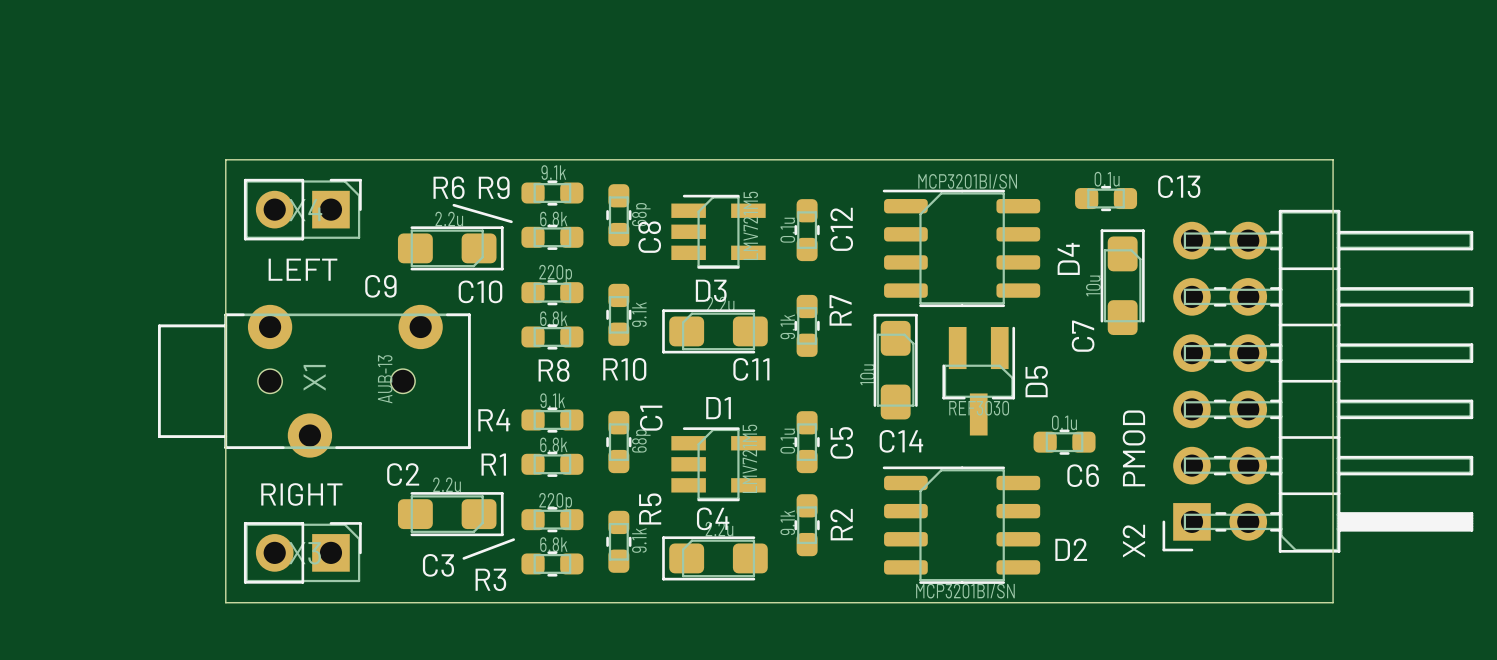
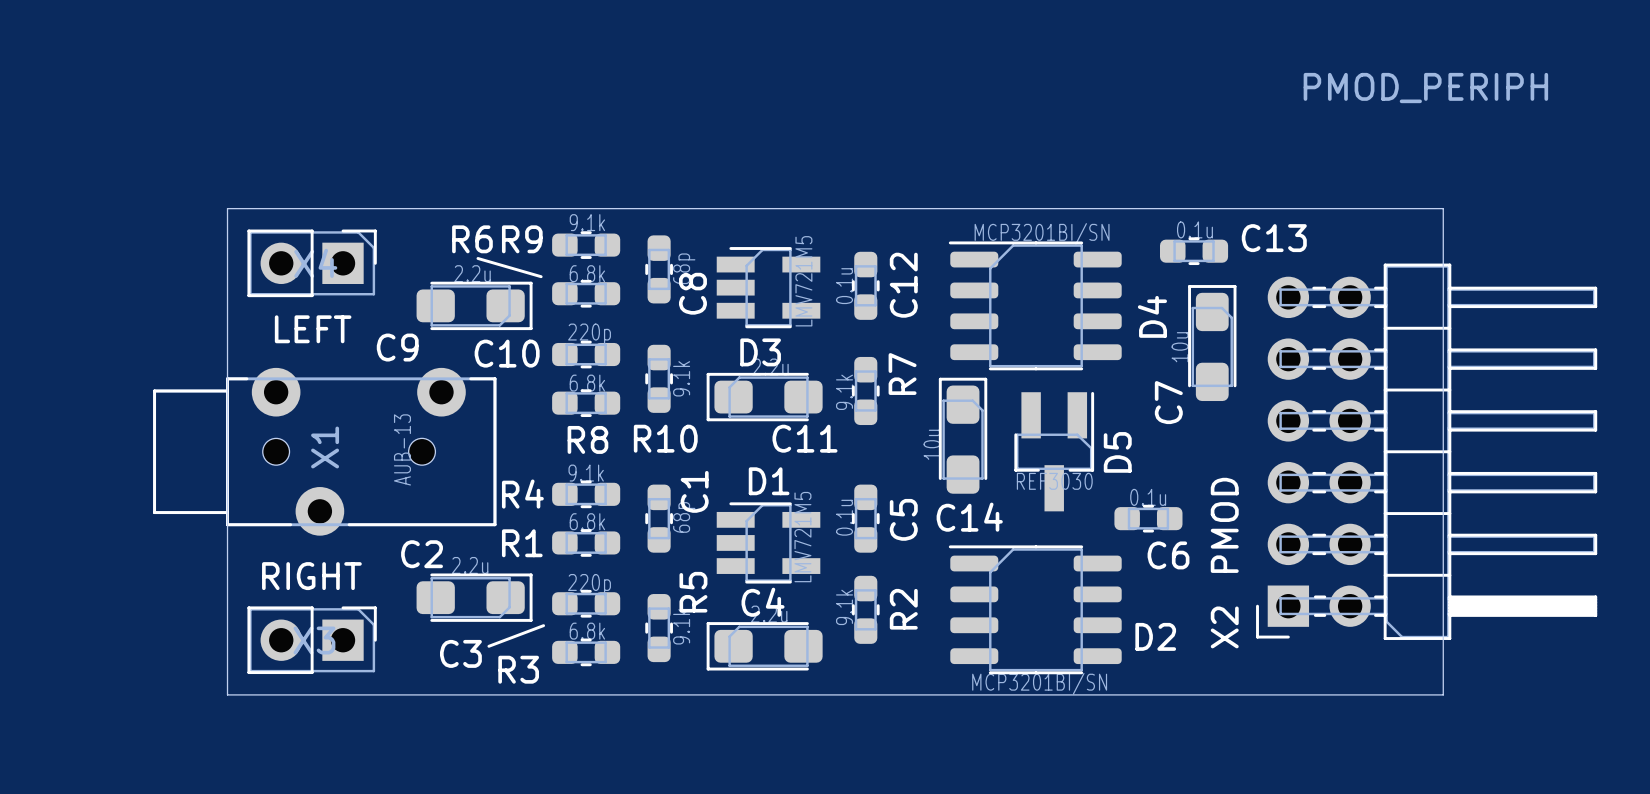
X2 value: none -> PMOD_PERIPH (1425, 88)

